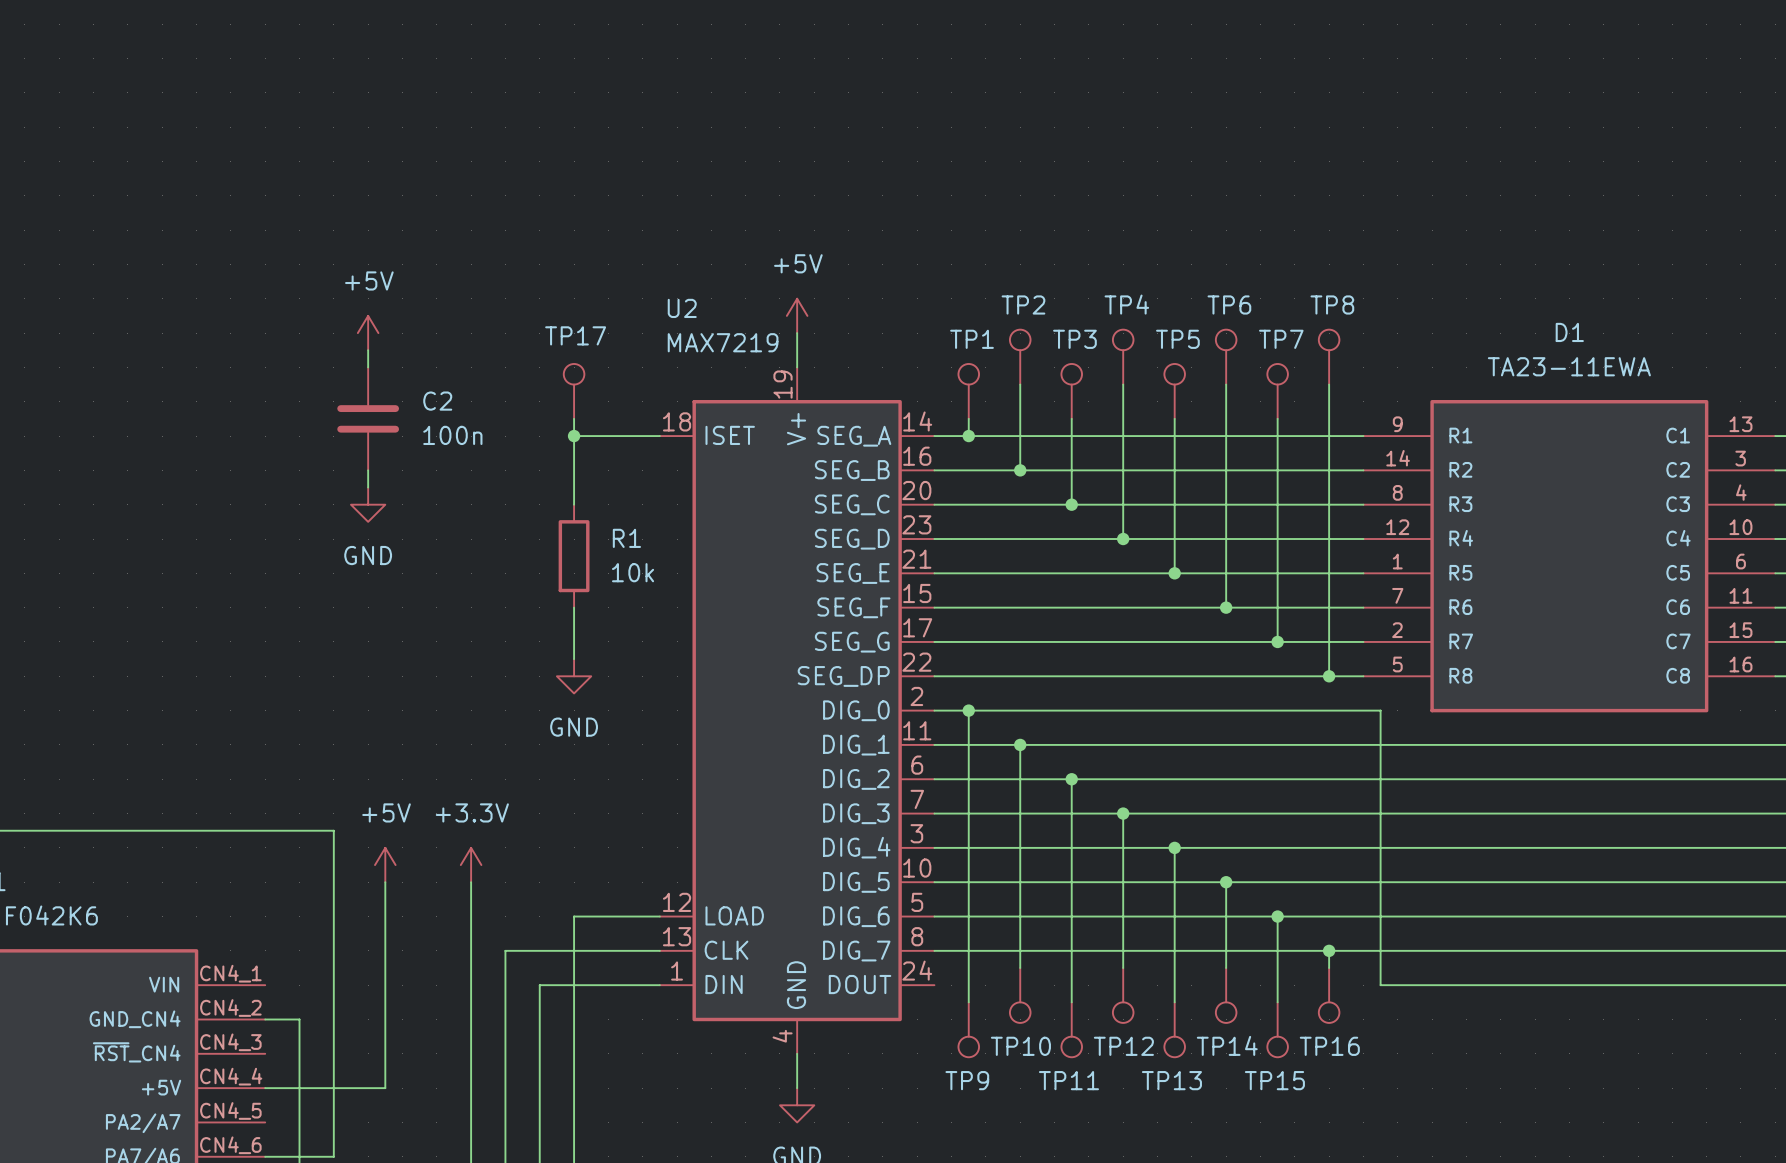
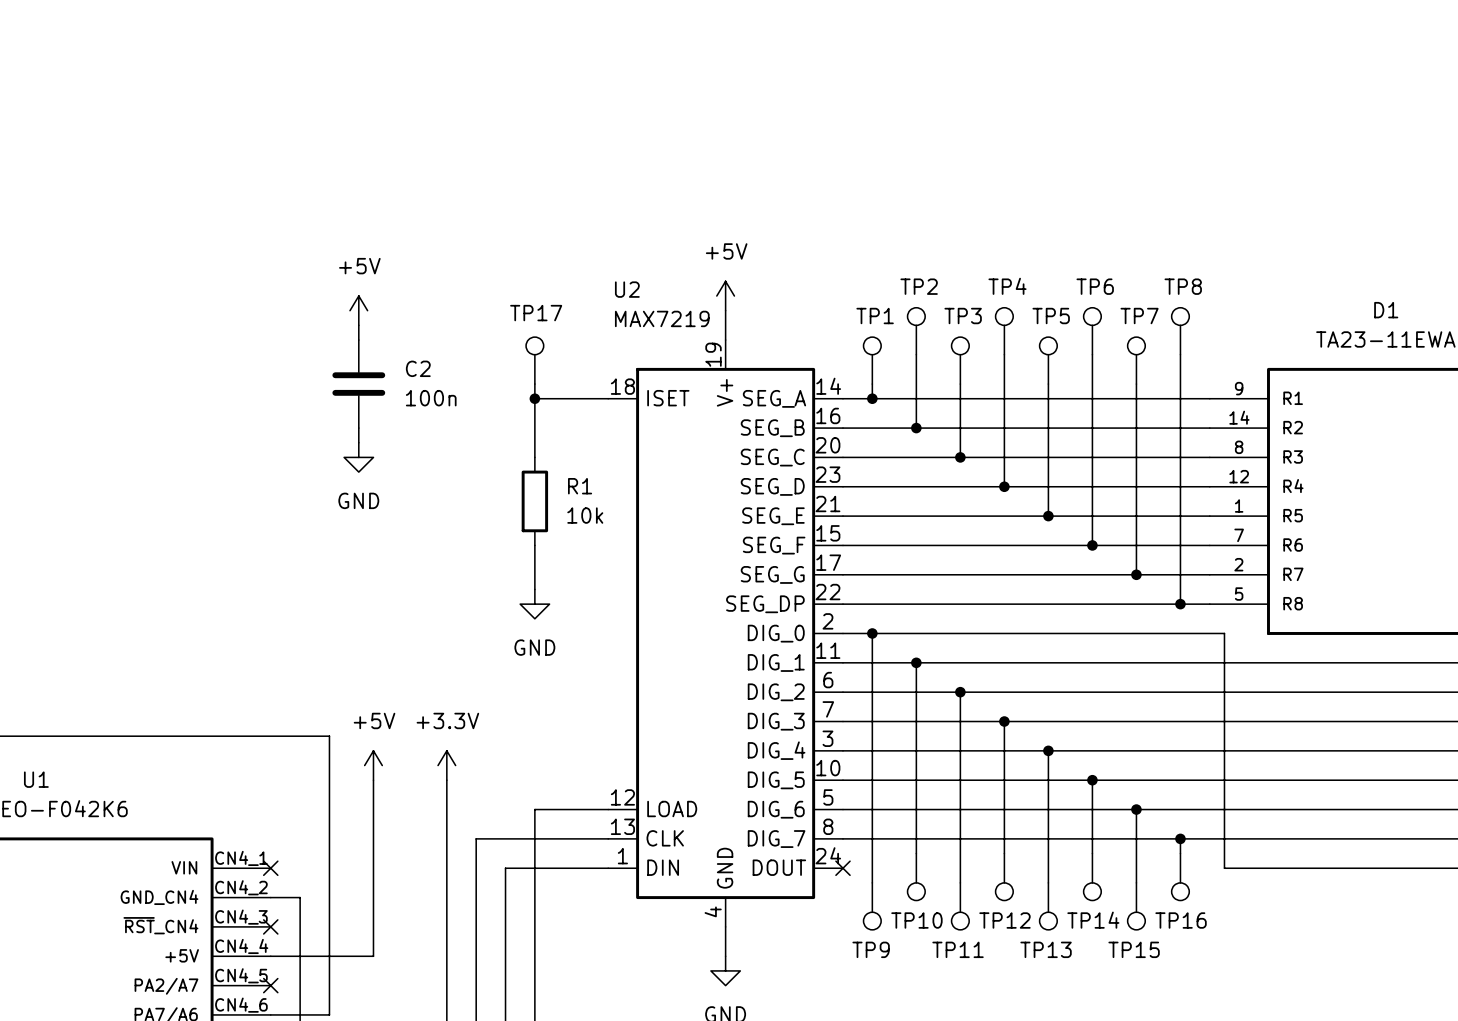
no-connect mark: none -> (270, 868)
no-connect mark: none -> (842, 868)
no-connect mark: none -> (270, 926)
no-connect mark: none -> (270, 985)

